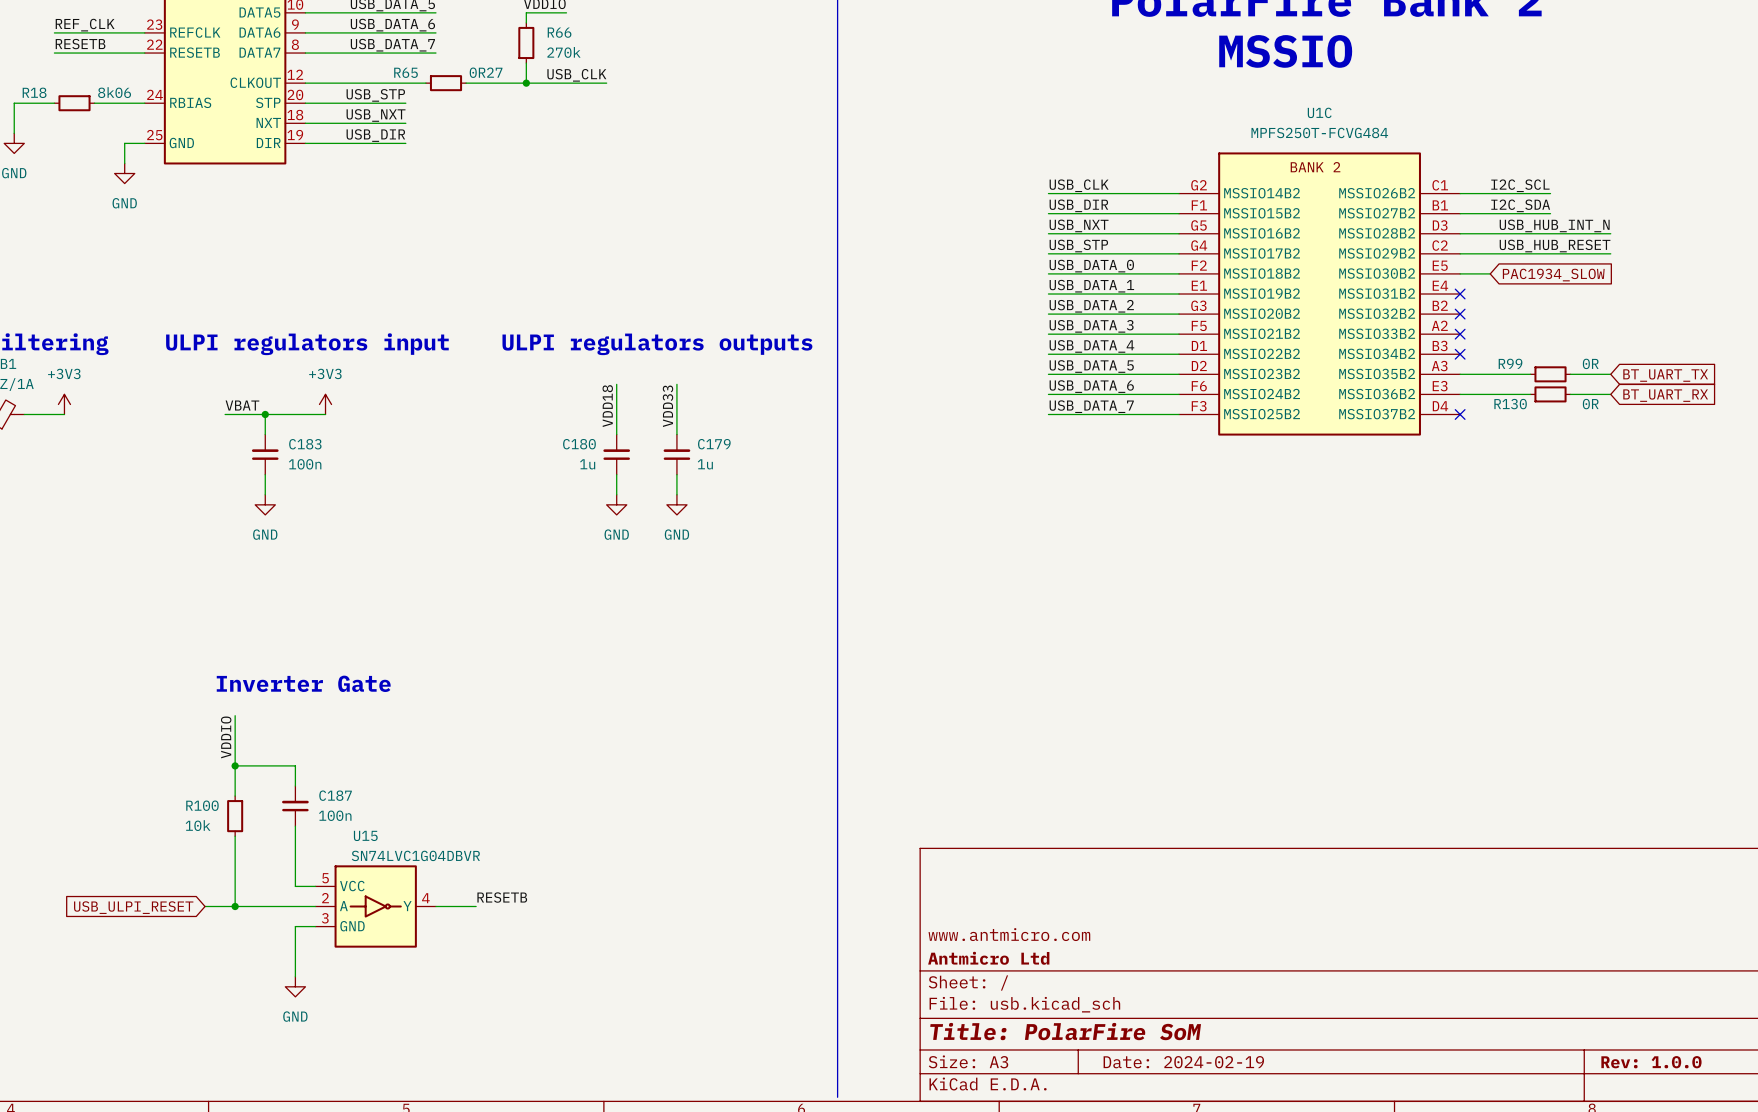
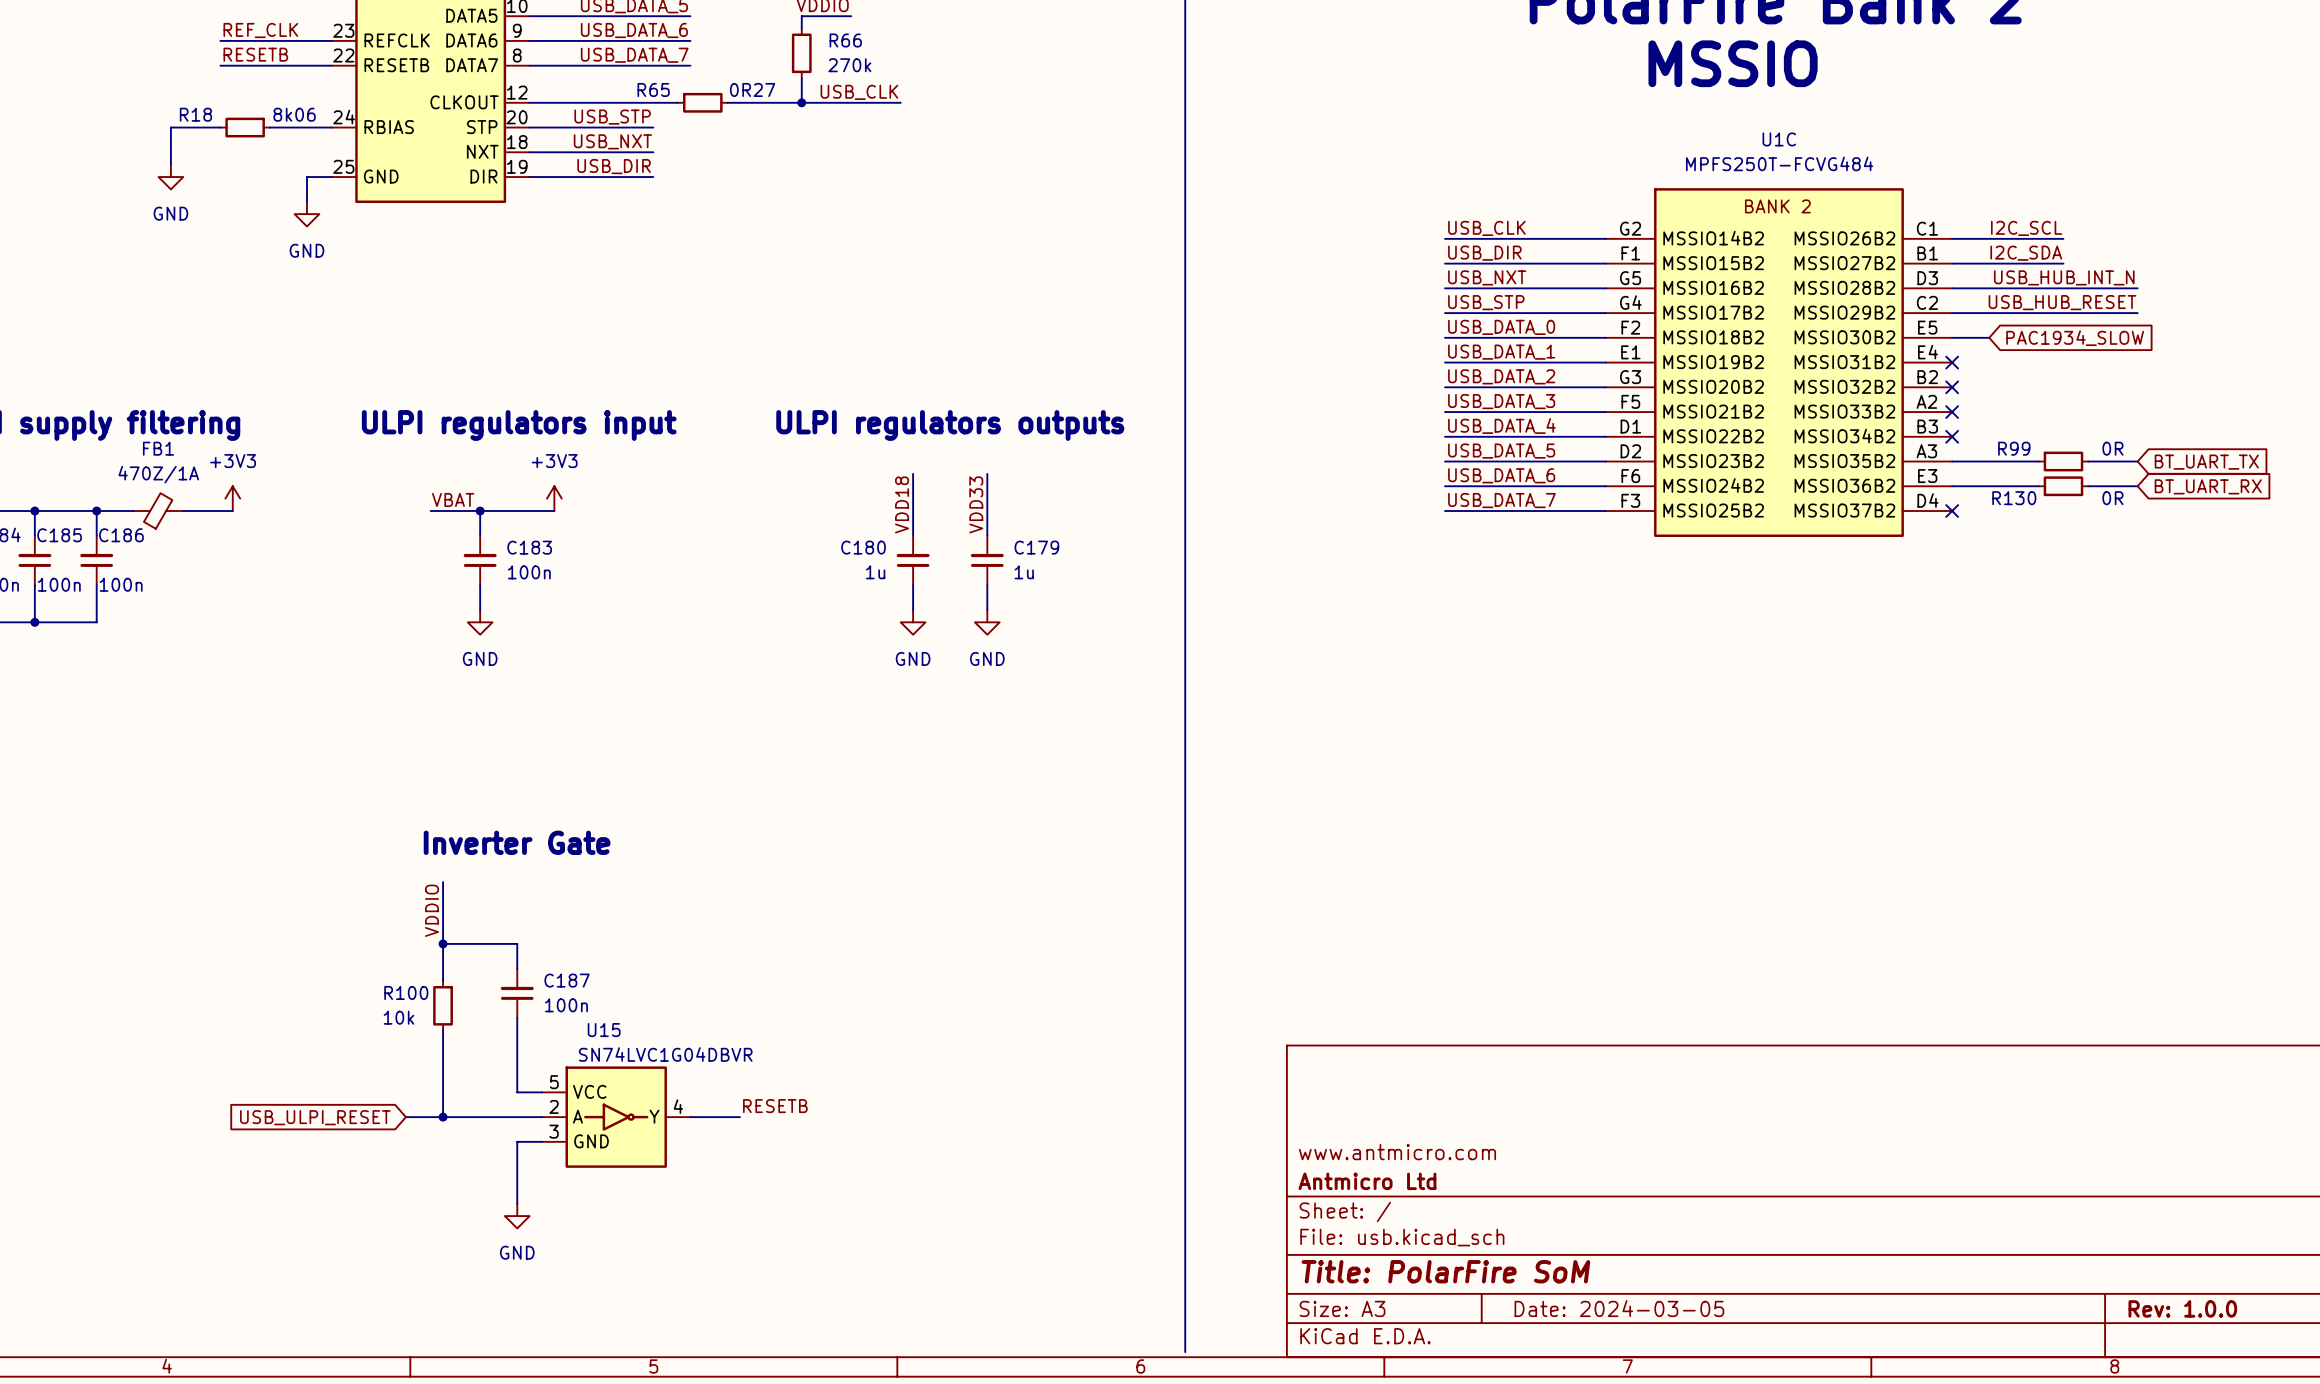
title block: Date: 2024-02-19 (1183, 1062) -> Date: 2024-03-05 (1619, 1308)

